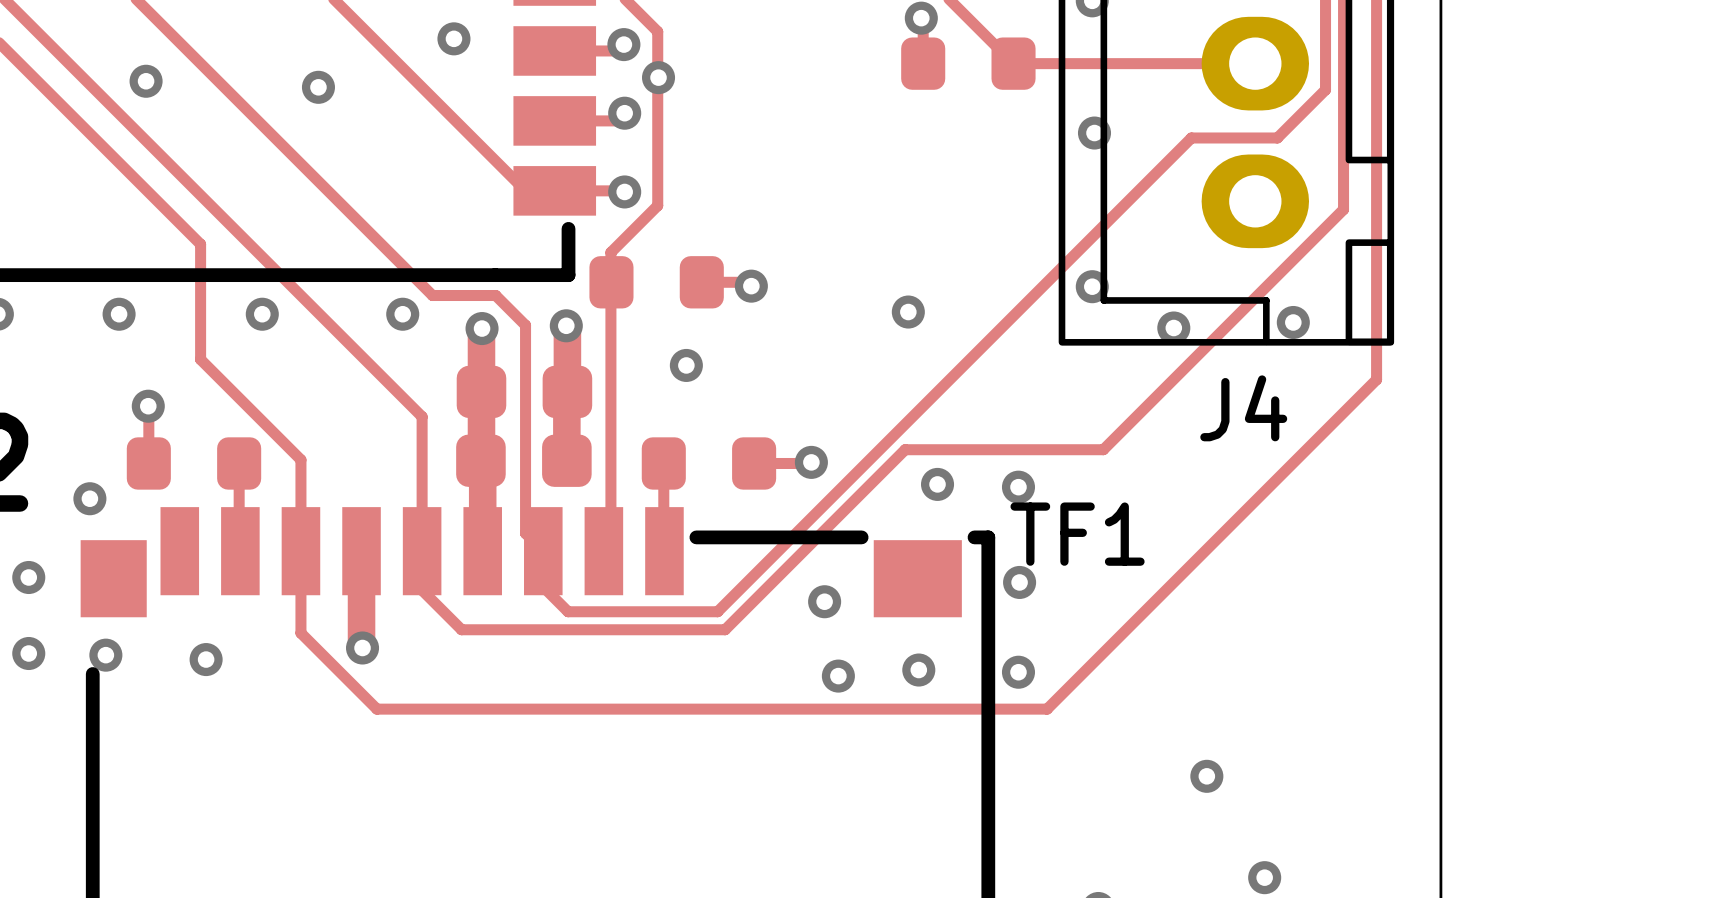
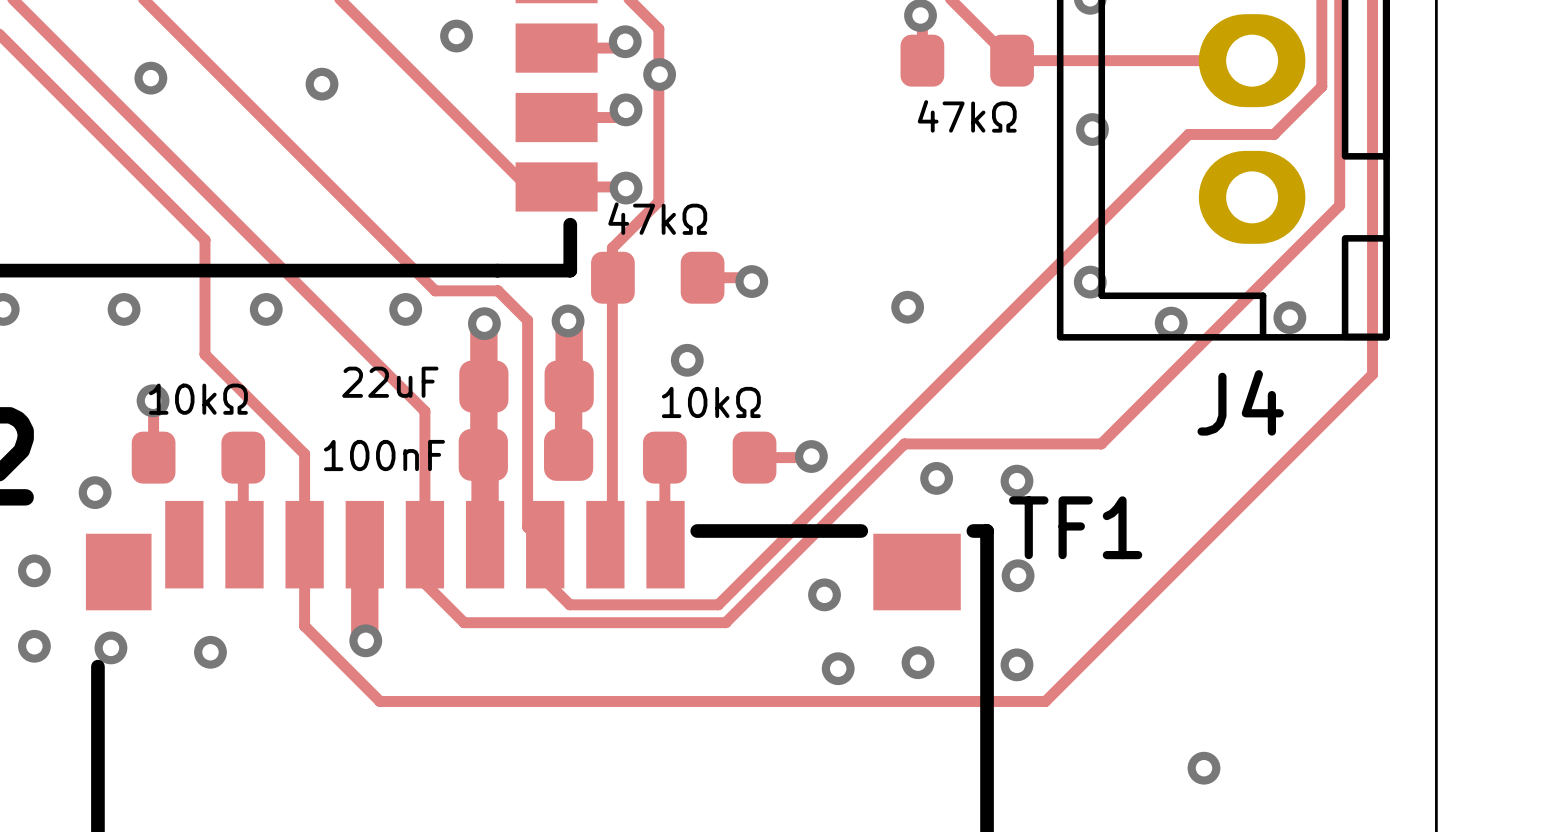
part value: none -> 47kΩ (967, 116)
part value: none -> 47kΩ (657, 218)
part value: none -> 22uF (390, 382)
part value: none -> 10kΩ (198, 399)
part value: none -> 10kΩ (711, 402)
part value: none -> 100nF (384, 455)

